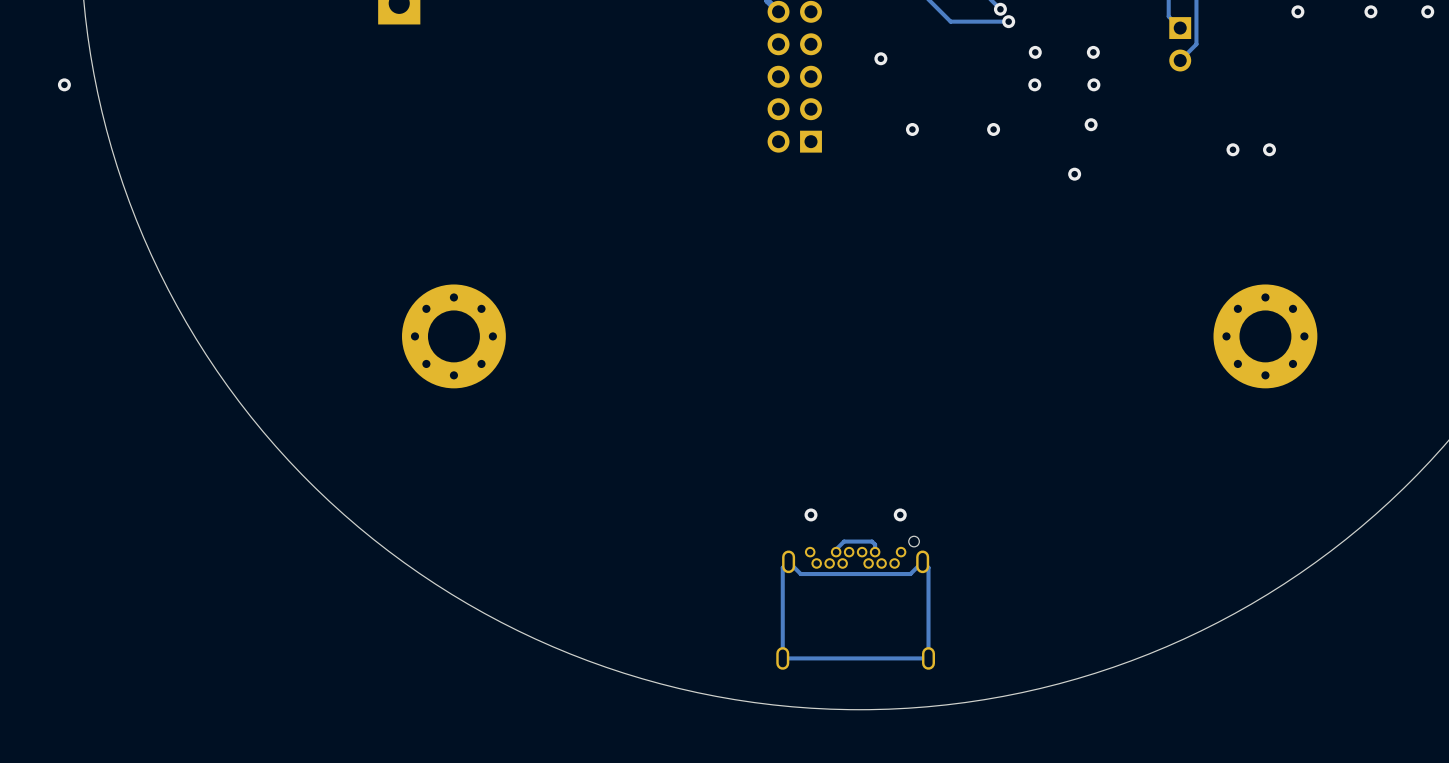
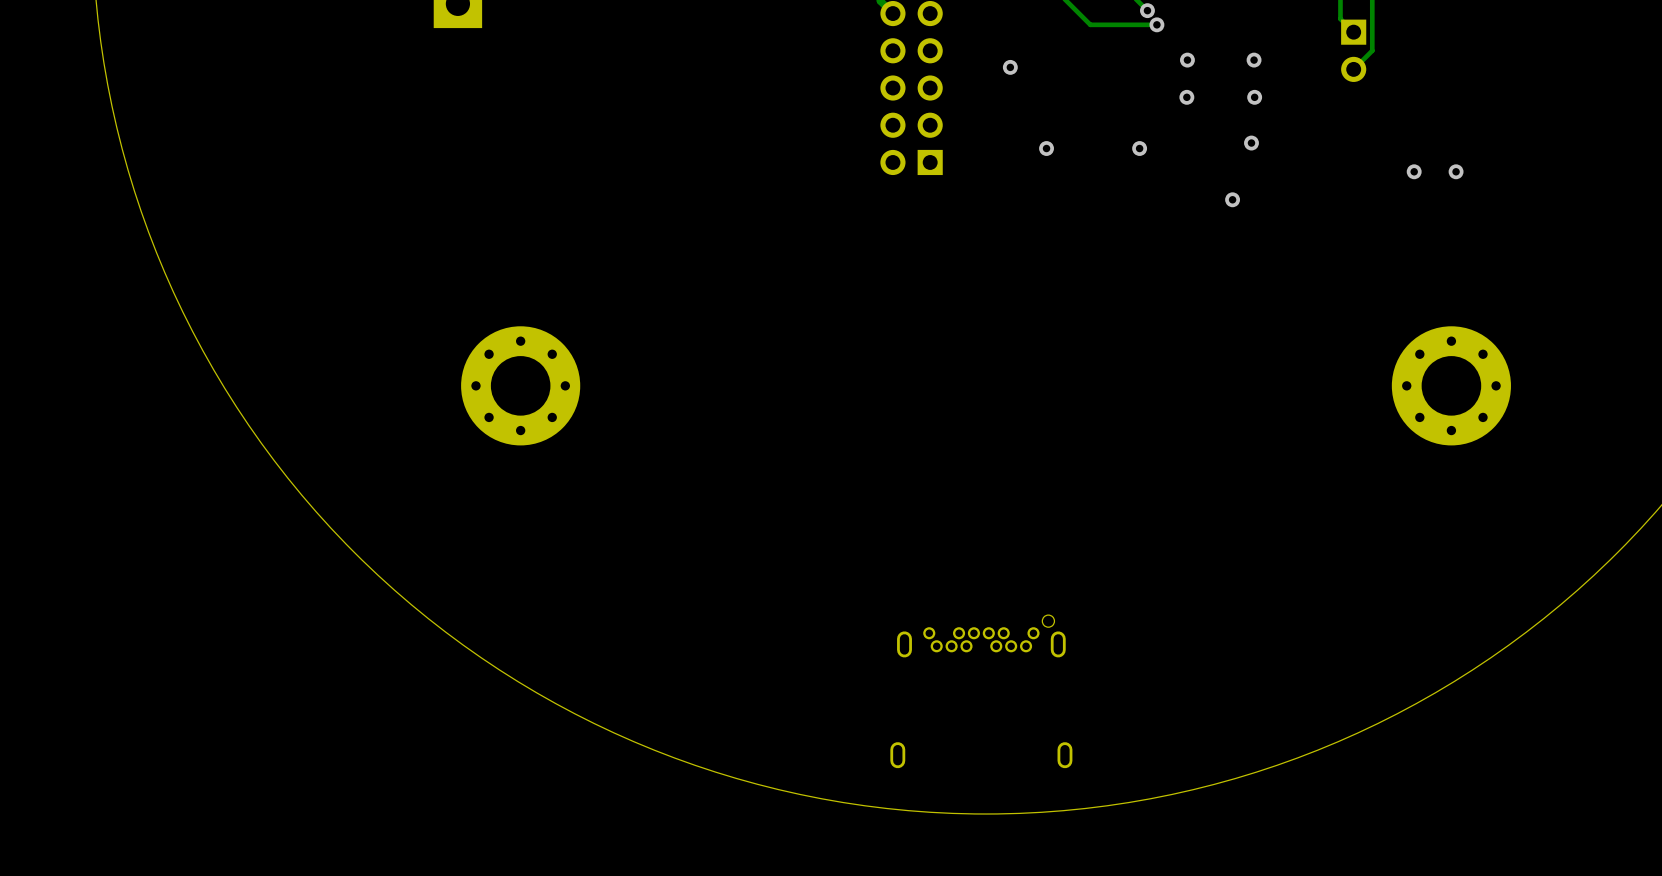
via: (1297, 11) -> none
via: (1370, 11) -> none
via: (1427, 11) -> none
via: (64, 84) -> none
via: (811, 514) -> none
via: (900, 514) -> none
track: (875, 552) (875, 544) (872, 541) (844, 541) (836, 549) (836, 552) -> none
track: (922, 561) (910, 574) (800, 574) (788, 561) (782, 567) (782, 658) (928, 658) (928, 567) (922, 561) -> none

